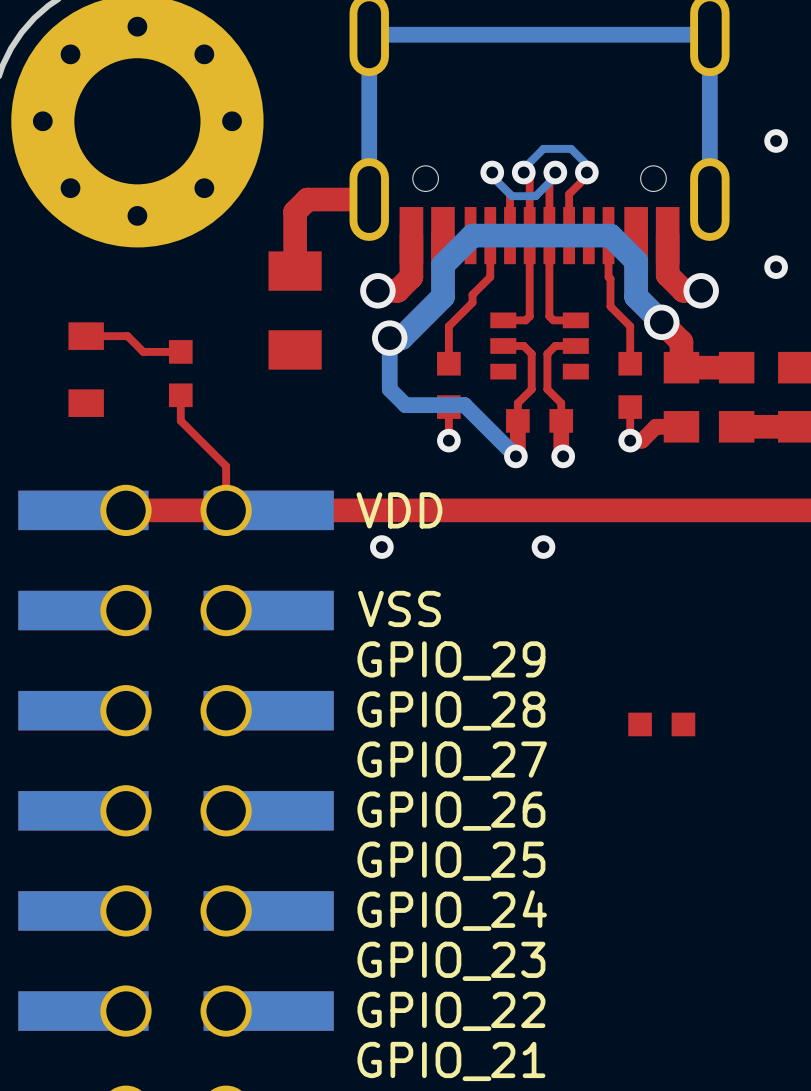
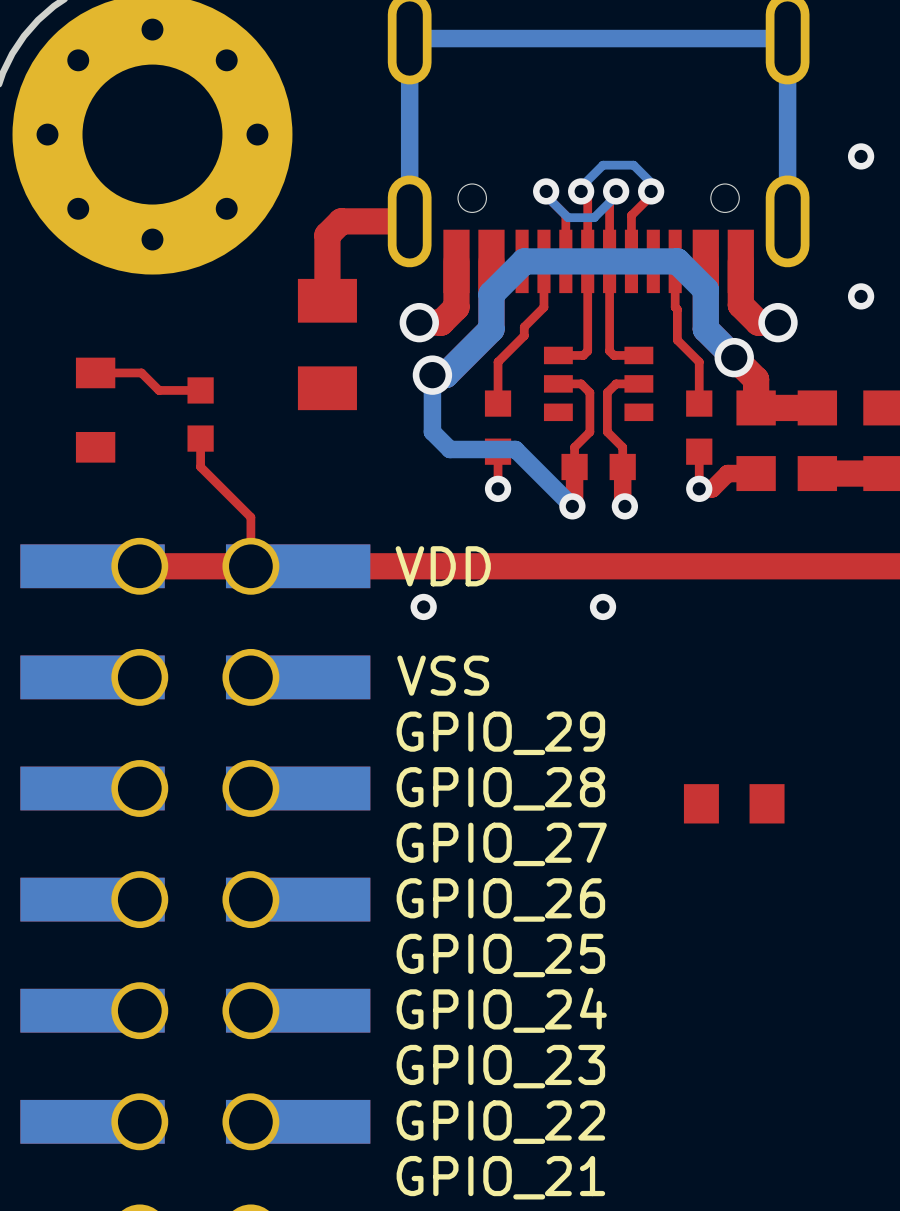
part footprint: [628, 712, 696, 737] -> [683, 784, 785, 824]

